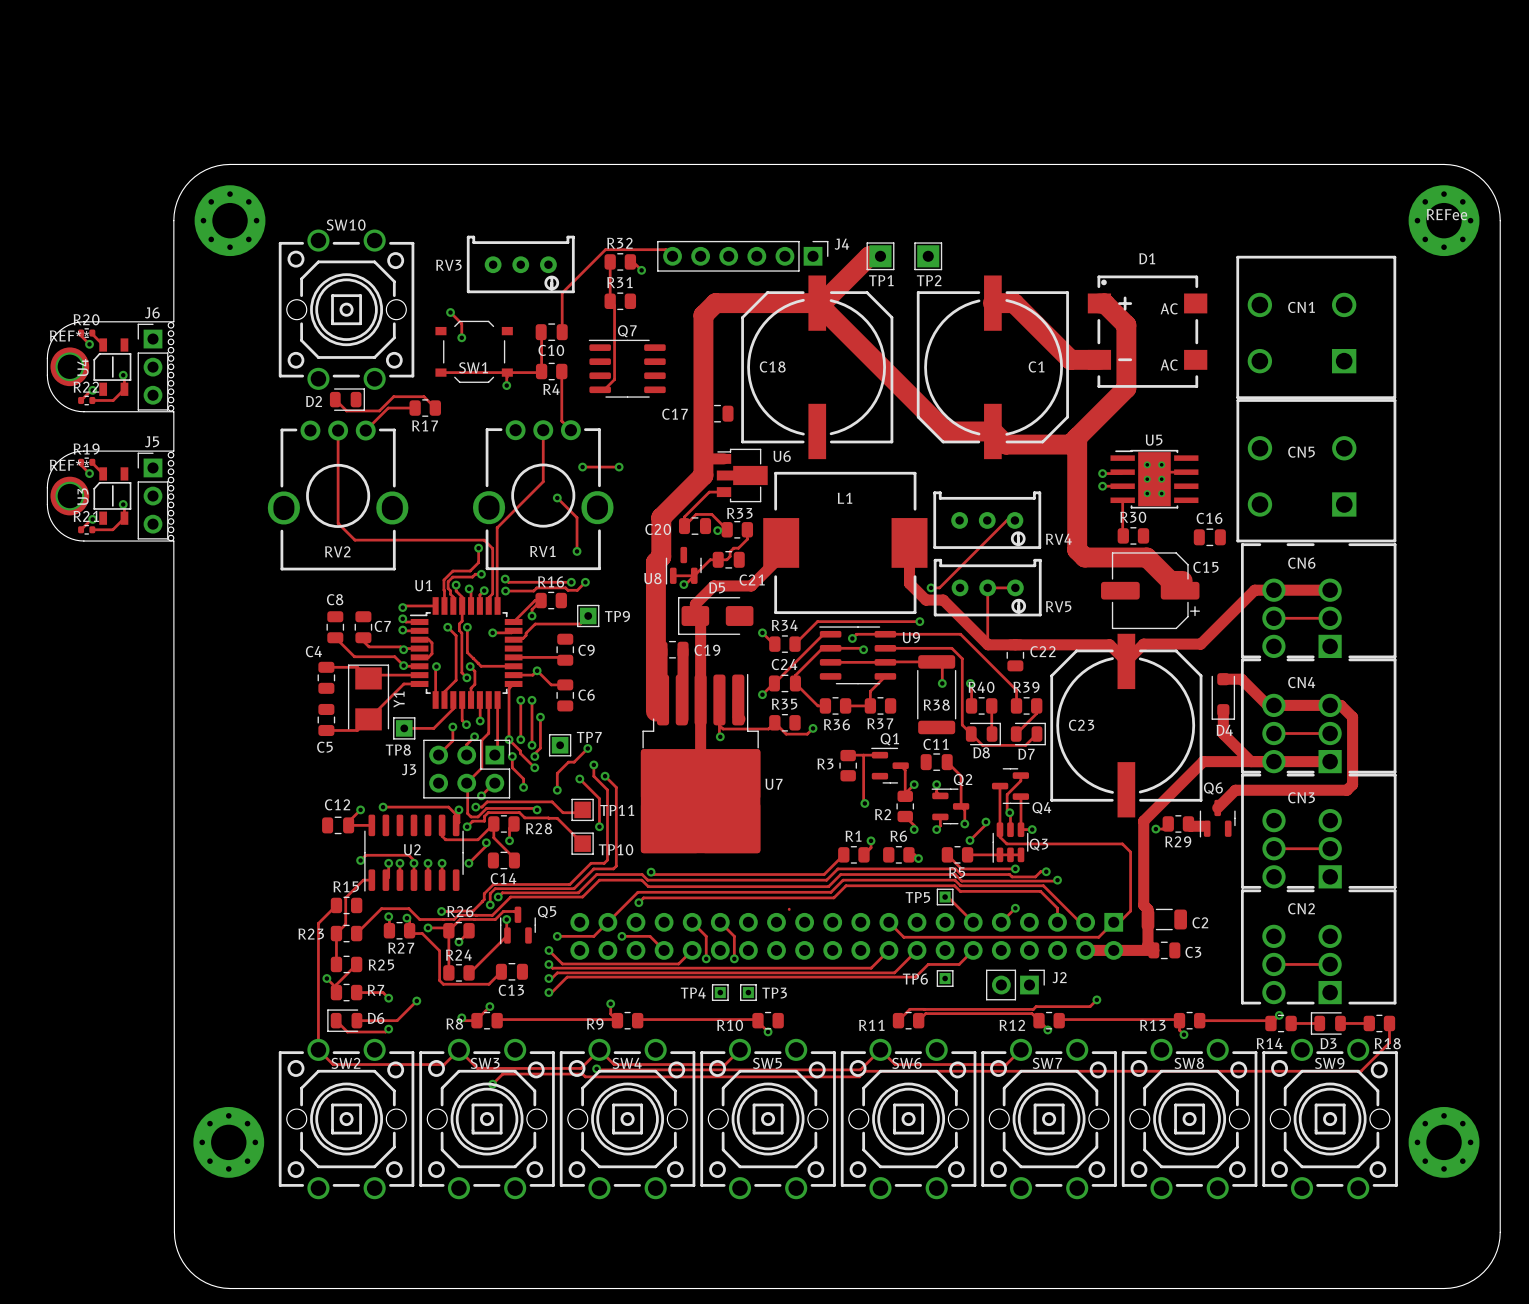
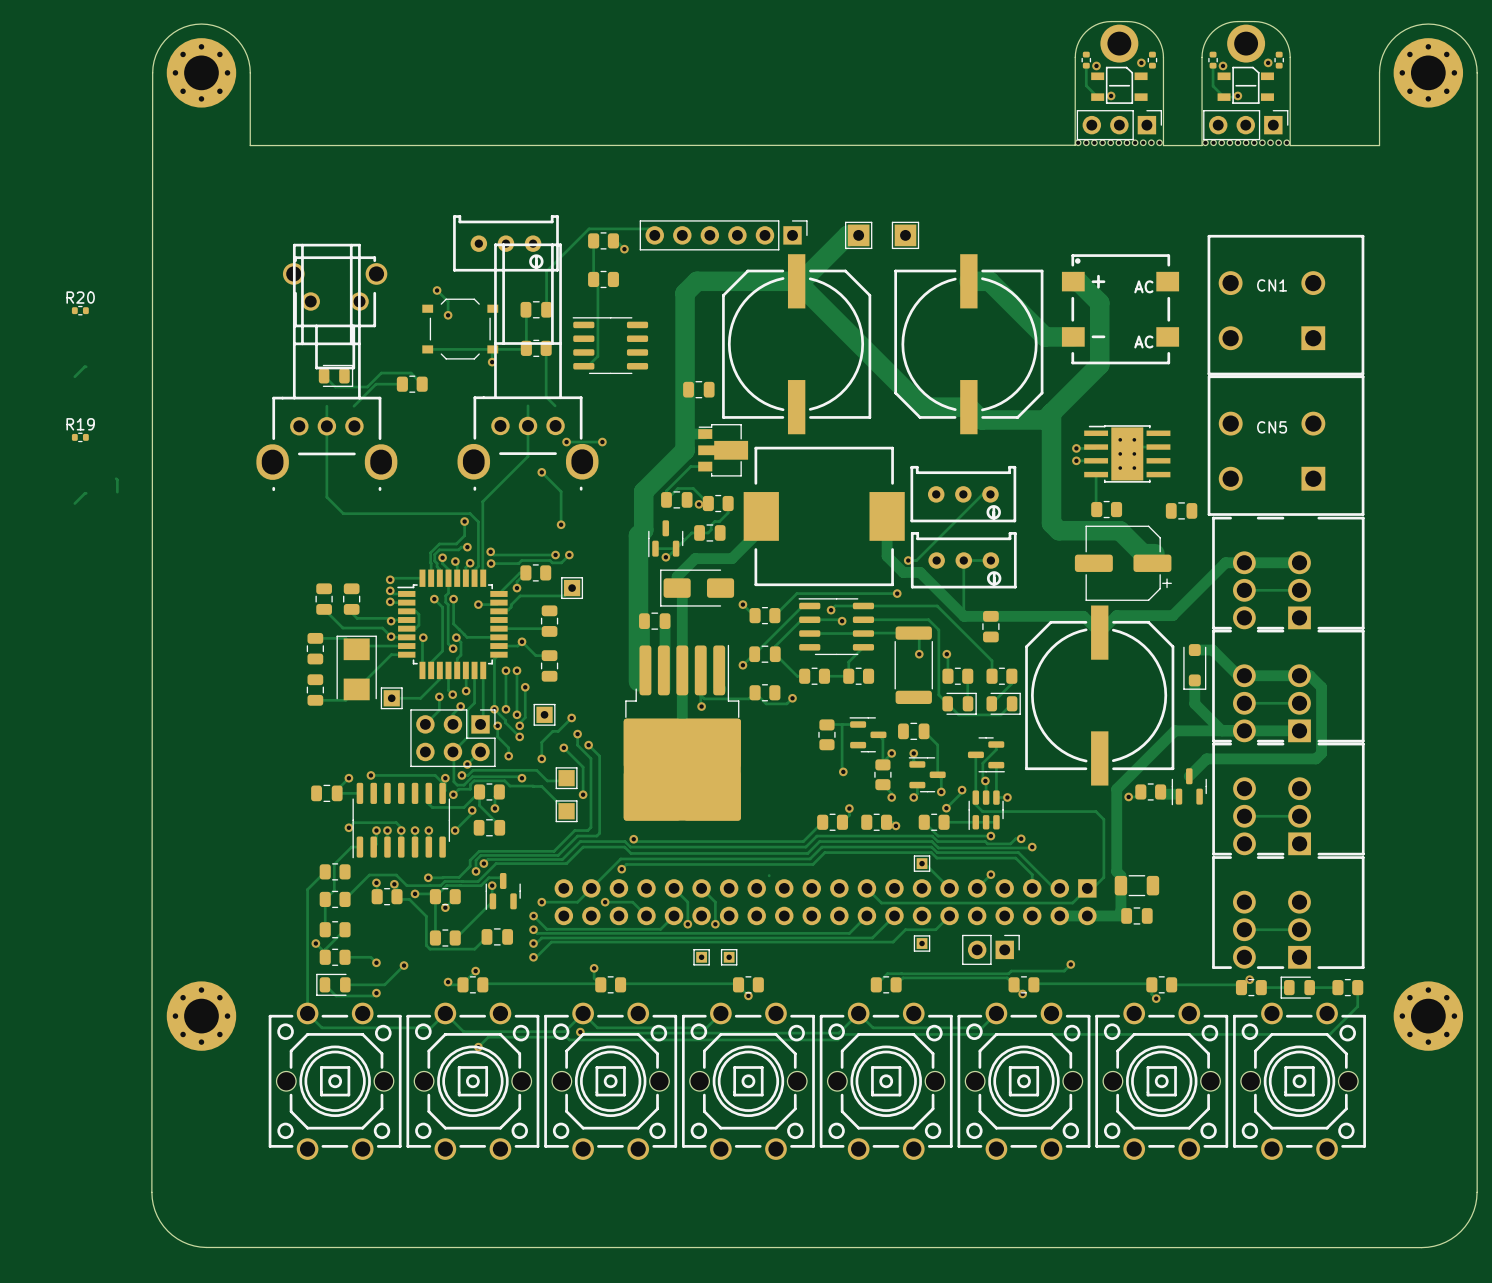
part: none -> (1119, 43)
part: none -> (1246, 43)
part: none -> (1086, 60)
part: none -> (1152, 60)
part: none -> (1213, 60)
part: none -> (1279, 60)
via: none -> (1141, 62)
via: none -> (1268, 62)
track: none -> (1086, 65) (1086, 85) (1097, 99)
via: none -> (1096, 65)
track: none -> (1213, 65) (1213, 86) (1224, 97) (1237, 95)
via: none -> (1223, 65)
part: none -> (1428, 72)
part: none -> (1119, 85)
part: none -> (1245, 85)
via: none -> (1111, 95)
via: none -> (1237, 95)
part: none -> (1119, 125)
part: none -> (1245, 125)
part: none -> (1118, 142)
part: none -> (1246, 142)
board edge: (173, 220) (179, 196) (190, 180) (211, 167) (230, 164) (1444, 164) (1462, 167) (1479, 176) (1494, 196) (1500, 220) (1500, 1232) (1497, 1250) (1487, 1267) (1468, 1282) (1444, 1288) (230, 1288) (211, 1285) (195, 1276) (179, 1256) (174, 1232) (173, 541) (83, 541) (71, 538) (61, 533) (52, 523) (47, 504) (47, 483) (50, 471) (58, 461) (68, 454) (83, 451) (173, 451) (173, 411) (83, 411) (68, 408) (58, 401) (50, 391) (47, 379) (47, 358) (49, 346) (55, 335) (71, 323) (83, 321) (173, 321) (173, 220) -> (1477, 1192) (1471, 1216) (1460, 1231) (1445, 1242) (1421, 1247) (206, 1247) (188, 1244) (172, 1235) (157, 1216) (151, 1192) (152, 72) (155, 55) (164, 40) (178, 29) (201, 24) (224, 29) (238, 40) (244, 50) (249, 66) (250, 145) (1075, 145) (1075, 57) (1078, 41) (1085, 32) (1099, 23) (1131, 21) (1143, 25) (1152, 32) (1162, 49) (1163, 145) (1202, 145) (1202, 57) (1205, 41) (1215, 29) (1226, 23) (1258, 21) (1276, 29) (1284, 38) (1289, 49) (1290, 145) (1379, 145) (1379, 66) (1388, 45) (1405, 29) (1422, 24) (1445, 27) (1460, 36) (1473, 55) (1477, 72) (1477, 1192)
part position: (230, 220) -> (201, 72)
REFee: (1444, 220) -> none
R32 name: R32 (619, 243) -> none
J4 name: J4 (841, 244) -> none
D1 name: D1 (1147, 258) -> none
RV3 name: RV3 (448, 265) -> none
TP1 name: TP1 (881, 280) -> none
TP2 name: TP2 (929, 280) -> none
R31 name: R31 (619, 282) -> none
SW10: (346, 309) -> none
Q7 name: Q7 (627, 331) -> none
track: (81, 333) (81, 335) (89, 344) -> none
track: (92, 333) (103, 345) -> none
part: none -> (335, 312)
via: (89, 344) -> none
C10 name: C10 (551, 350) -> none
REF**: (69, 366) -> none
part: (171, 366) -> none
C18 name: C18 (772, 366) -> none
C1 name: C1 (1036, 366) -> none
U4: (112, 367) -> none
J6: (153, 367) -> none
SW1 name: SW1 (473, 367) -> none
track: (123, 375) (124, 389) (113, 400) (92, 400) -> none
via: (123, 375) -> none
R4 name: R4 (551, 389) -> none
via: (92, 390) -> none
part: none -> (326, 367)
part: none -> (528, 367)
R22: (86, 400) -> none
D2 name: D2 (314, 401) -> none
C17 name: C17 (675, 414) -> none
R17 name: R17 (425, 425) -> none
U5 name: U5 (1154, 440) -> none
U6 name: U6 (782, 456) -> none
track: (81, 462) (81, 465) (89, 473) -> none
track: (92, 462) (103, 473) -> none
via: (89, 473) -> none
RV2: (338, 495) -> none
RV1: (543, 495) -> none
REF**: (69, 496) -> none
U3: (112, 496) -> none
J5: (153, 496) -> none
part: (171, 496) -> none
L1 name: L1 (845, 498) -> none
via: (123, 504) -> none
R33 name: R33 (739, 513) -> none
R30 name: R30 (1133, 517) -> none
track: (126, 518) (112, 529) (92, 529) -> none
C16 name: C16 (1209, 518) -> none
via: (92, 519) -> none
R21: (86, 529) -> none
C20 name: C20 (658, 529) -> none
RV4 name: RV4 (1058, 539) -> none
CN6 name: CN6 (1301, 563) -> none
C15 name: C15 (1205, 567) -> none
U8 name: U8 (652, 578) -> none
C21 name: C21 (752, 580) -> none
R16 name: R16 (551, 581) -> none
U1 name: U1 (423, 585) -> none
D5 name: D5 (717, 587) -> none
C8 name: C8 (335, 599) -> none
RV5 name: RV5 (1058, 606) -> none
TP9 name: TP9 (617, 616) -> none
R34 name: R34 (784, 625) -> none
C7 name: C7 (382, 626) -> none
U9 name: U9 (911, 637) -> none
C9 name: C9 (586, 650) -> none
C19 name: C19 (707, 650) -> none
C4 name: C4 (313, 651) -> none
C22 name: C22 (1043, 651) -> none
C24 name: C24 (784, 664) -> none
CN4 name: CN4 (1301, 682) -> none
R40 name: R40 (981, 687) -> none
R39 name: R39 (1026, 687) -> none
C6 name: C6 (586, 695) -> none
Y1 name: Y1 (399, 699) -> none
R35 name: R35 (784, 704) -> none
R38 name: R38 (936, 705) -> none
R37 name: R37 (880, 723) -> none
R36 name: R36 (836, 724) -> none
C23 name: C23 (1081, 725) -> none
D4 name: D4 (1224, 730) -> none
TP7 name: TP7 (589, 737) -> none
Q1 name: Q1 (889, 739) -> none
C11 name: C11 (936, 744) -> none
C5 name: C5 (324, 747) -> none
TP8 name: TP8 (398, 750) -> none
D8 name: D8 (981, 752) -> none
D7 name: D7 (1026, 754) -> none
R3 name: R3 (825, 764) -> none
J3 name: J3 (409, 769) -> none
Q2 name: Q2 (963, 780) -> none
U7 name: U7 (774, 784) -> none
Q6 name: Q6 (1213, 788) -> none
CN3 name: CN3 (1301, 797) -> none
C12 name: C12 (337, 804) -> none
Q4 name: Q4 (1041, 808) -> none
TP11 name: TP11 (617, 810) -> none
R2 name: R2 (883, 814) -> none
R28 name: R28 (539, 828) -> none
R1 name: R1 (853, 836) -> none
R6 name: R6 (898, 836) -> none
R29 name: R29 (1178, 841) -> none
Q3 name: Q3 (1038, 844) -> none
U2 name: U2 (412, 849) -> none
TP10 name: TP10 (616, 849) -> none
R5 name: R5 (957, 872) -> none
C14 name: C14 (503, 878) -> none
R15 name: R15 (346, 886) -> none
TP5 name: TP5 (917, 897) -> none
CN2 name: CN2 (1301, 908) -> none
R26 name: R26 (460, 911) -> none
Q5 name: Q5 (547, 912) -> none
C2 name: C2 (1200, 922) -> none
R23 name: R23 (311, 934) -> none
R27 name: R27 (401, 948) -> none
C3 name: C3 (1193, 952) -> none
R24 name: R24 (458, 955) -> none
R25 name: R25 (381, 964) -> none
J2 name: J2 (1059, 977) -> none
TP6 name: TP6 (915, 979) -> none
R7 name: R7 (375, 990) -> none
C13 name: C13 (511, 990) -> none
TP4 name: TP4 (693, 993) -> none
TP3 name: TP3 (774, 993) -> none
D6 name: D6 (376, 1018) -> none
R8 name: R8 (454, 1024) -> none
R9 name: R9 (595, 1024) -> none
R10 name: R10 (730, 1025) -> none
R11 name: R11 (871, 1025) -> none
R12 name: R12 (1012, 1025) -> none
R13 name: R13 (1152, 1025) -> none
R14 name: R14 (1269, 1043) -> none
D3 name: D3 (1328, 1043) -> none
R18 name: R18 (1387, 1043) -> none
SW2 name: SW2 (345, 1063) -> none
SW3 name: SW3 (485, 1063) -> none
SW4 name: SW4 (627, 1063) -> none
SW5 name: SW5 (767, 1063) -> none
SW6 name: SW6 (906, 1063) -> none
SW7 name: SW7 (1047, 1063) -> none
SW8 name: SW8 (1189, 1063) -> none
SW9 name: SW9 (1329, 1063) -> none
part position: (228, 1142) -> (201, 1016)
part position: (1444, 1142) -> (1428, 1016)

